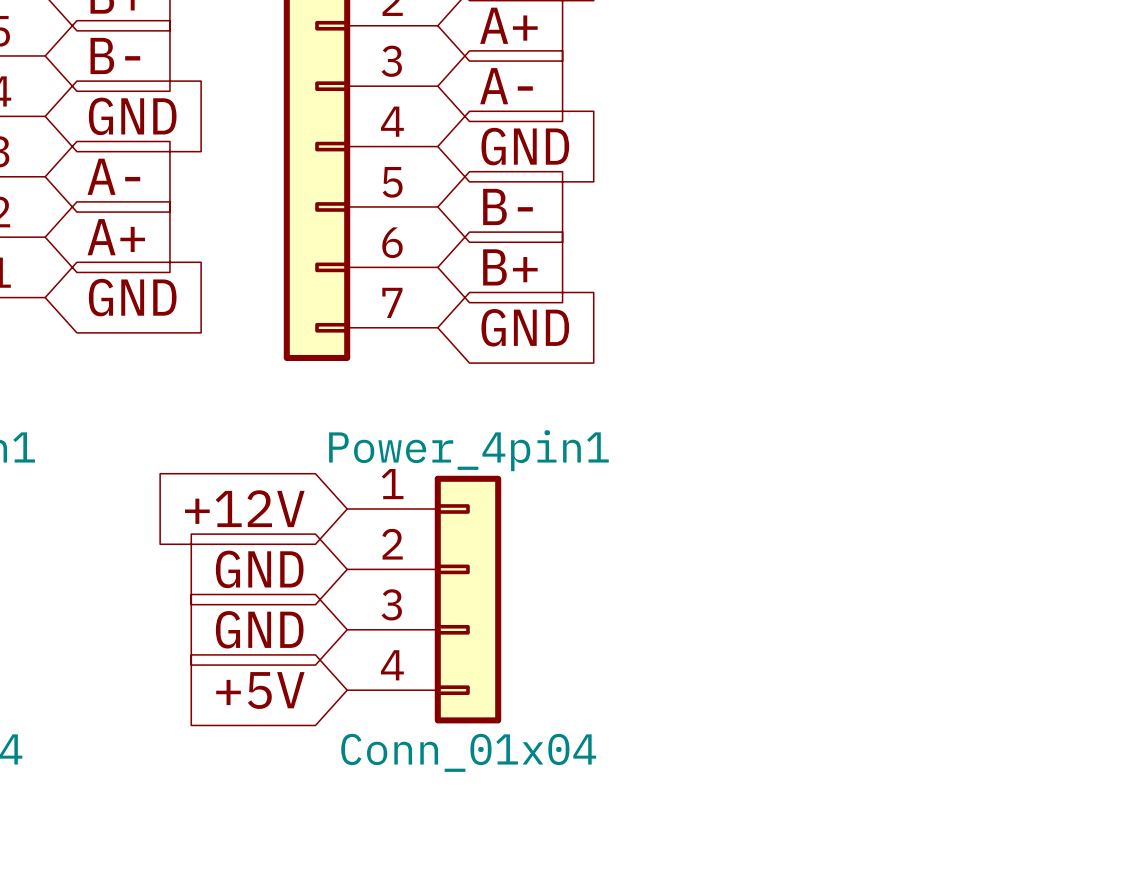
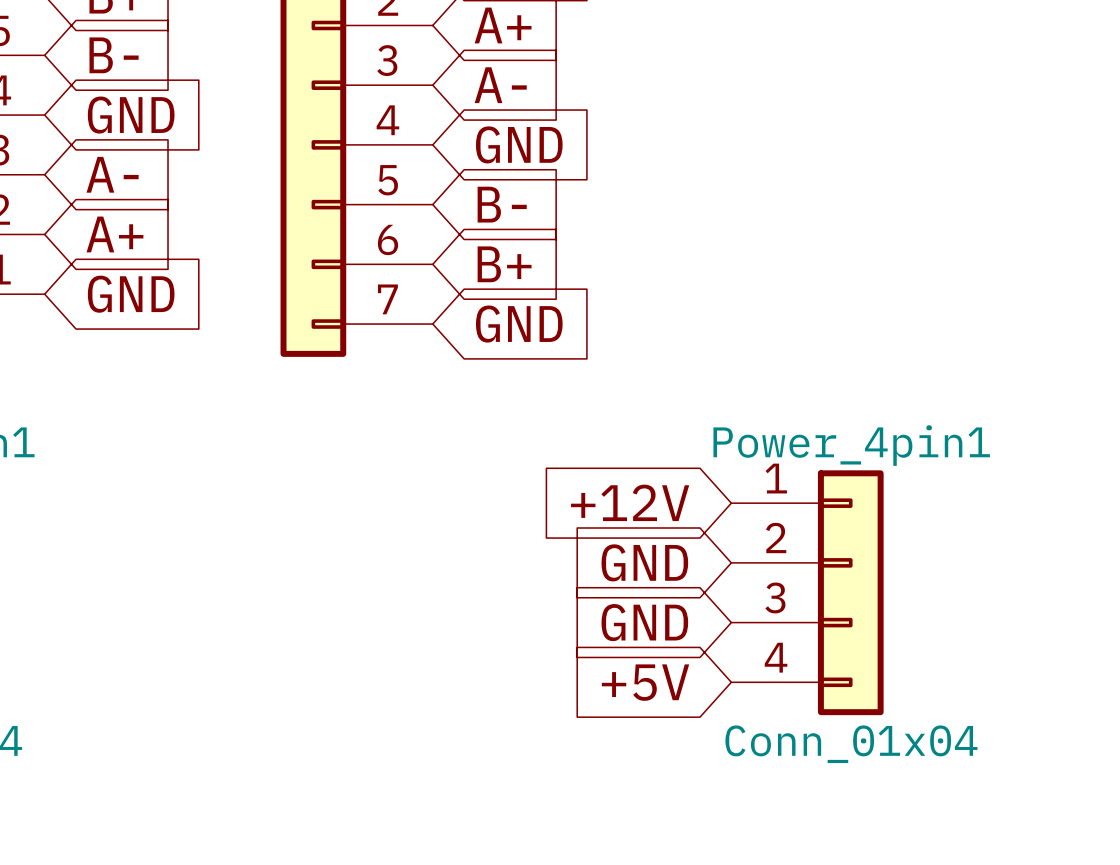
global label position: +12V (244, 508) -> +12V (630, 502)
global label: GND (259, 569) -> none
global label: none -> GND (644, 562)
Power_4pin1 position: (424, 599) -> (807, 592)
global label: GND (259, 629) -> none
global label: none -> GND (644, 622)
global label position: +5V (260, 690) -> +5V (645, 682)

